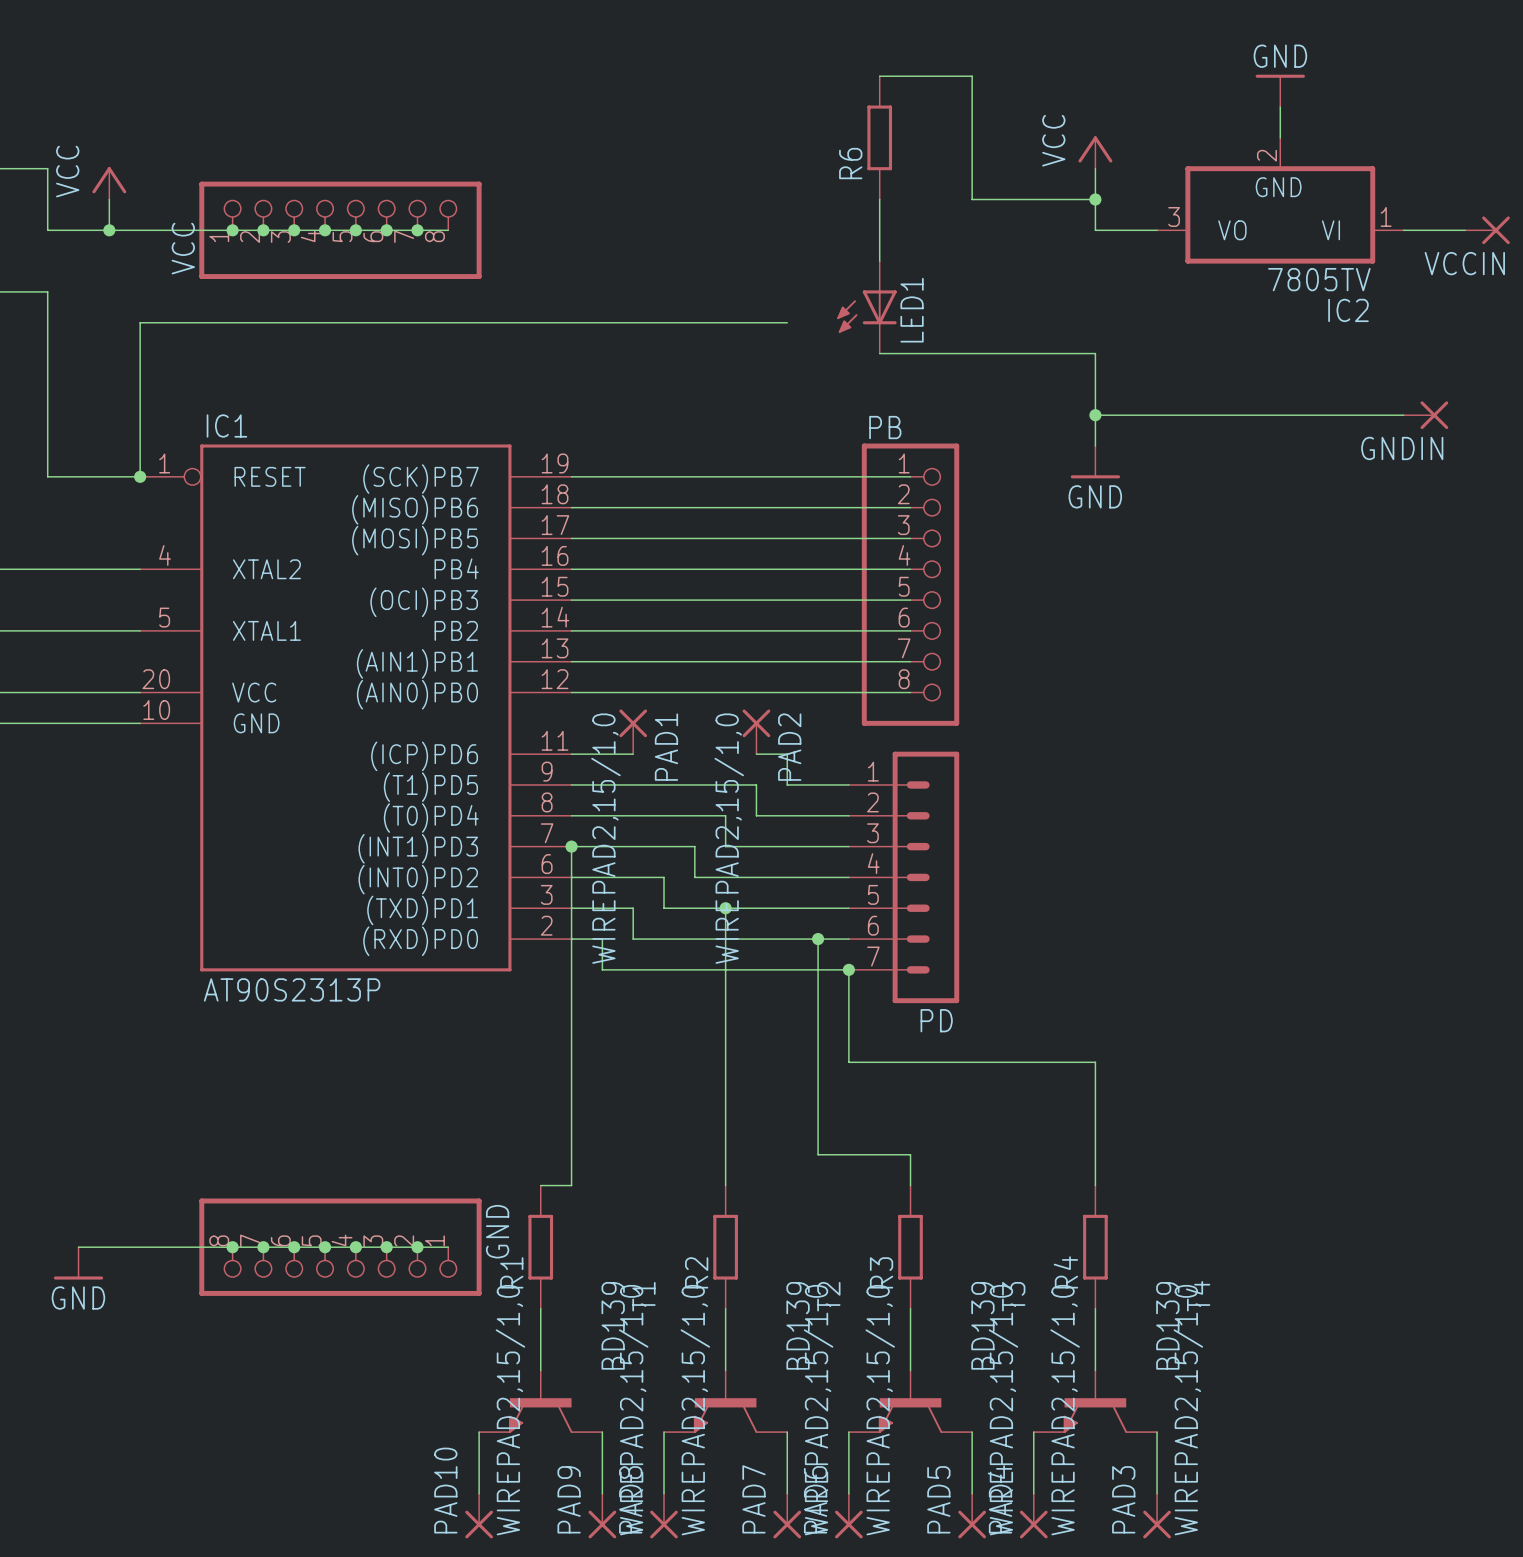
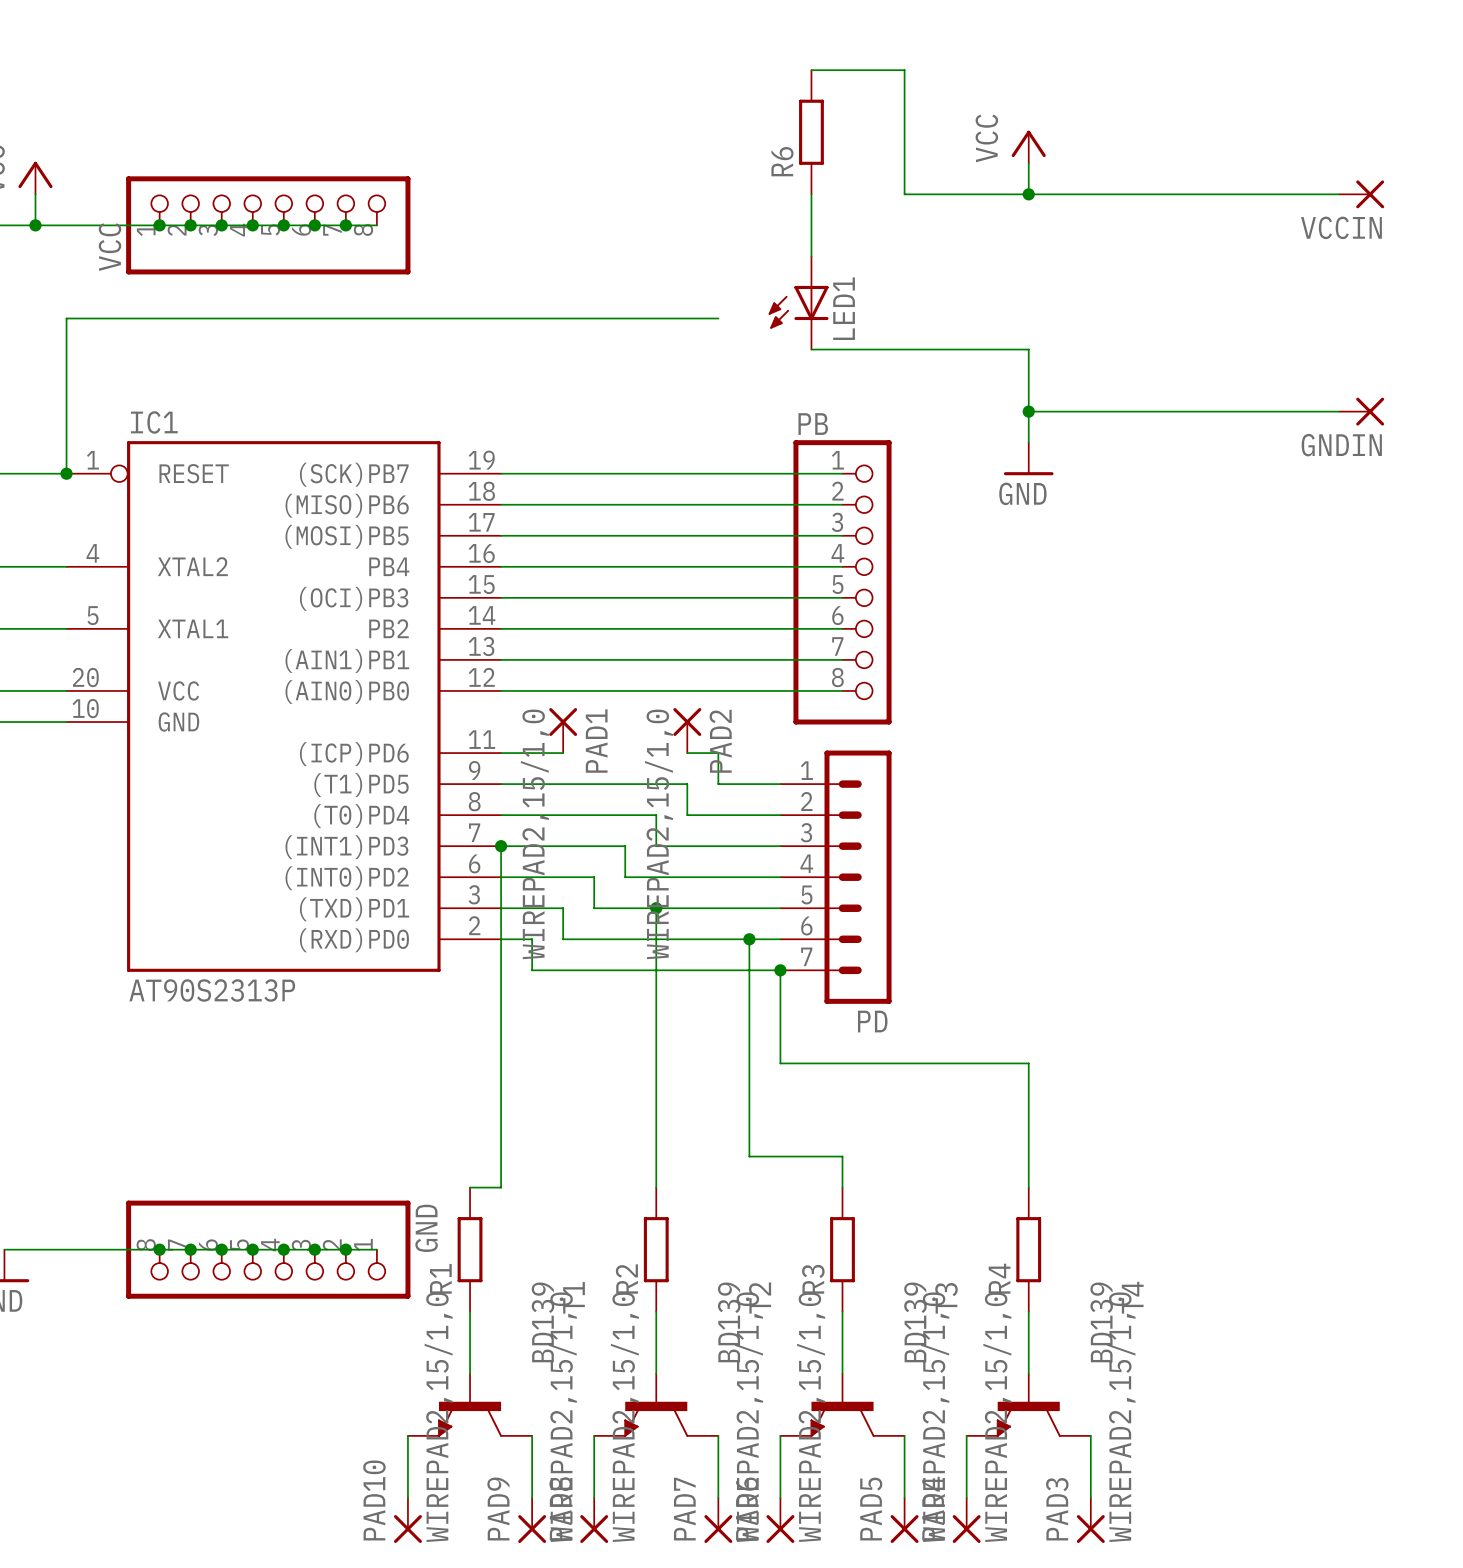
power symbol: GND (1280, 90) -> none
wire: (1280, 107) (1280, 137) -> none
wire: (1095, 199) (1095, 230) (1157, 230) -> (1028, 194) (1339, 194)
IC2: 7805TV (1280, 200) -> none
wire: (1403, 230) (1465, 230) -> none
VCCIN position: (1487, 230) -> (1361, 194)

